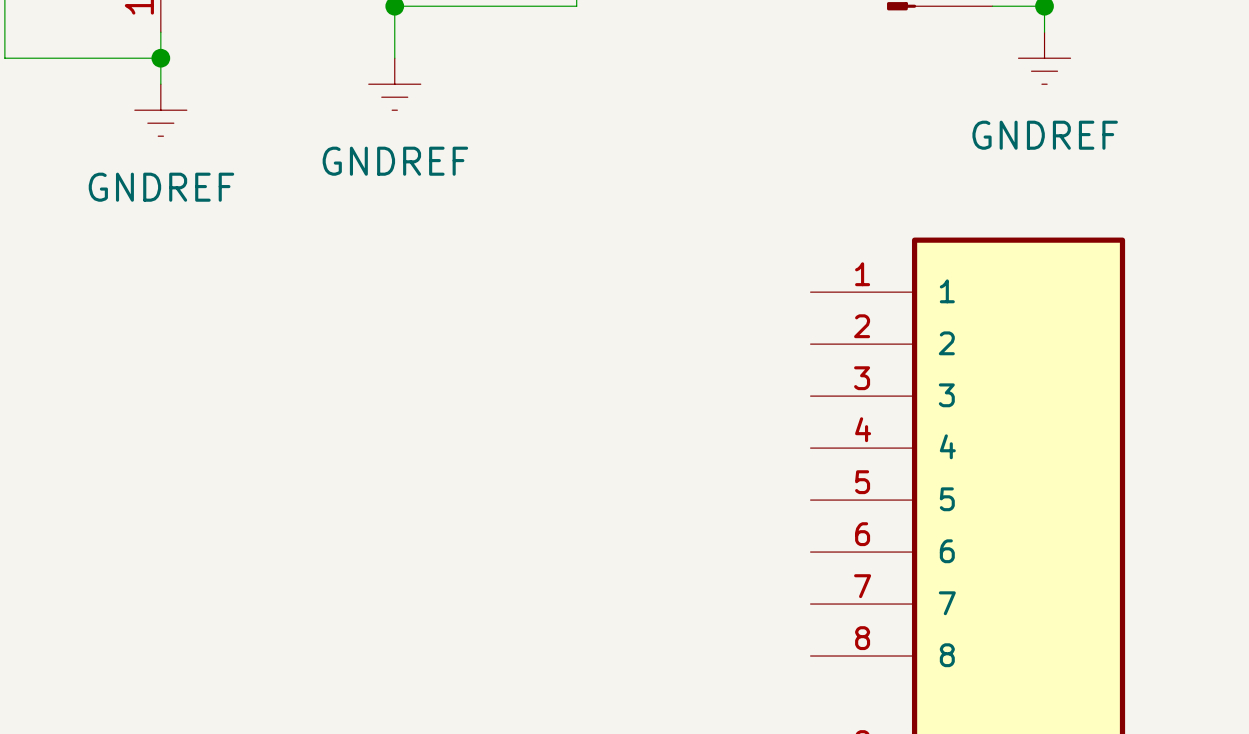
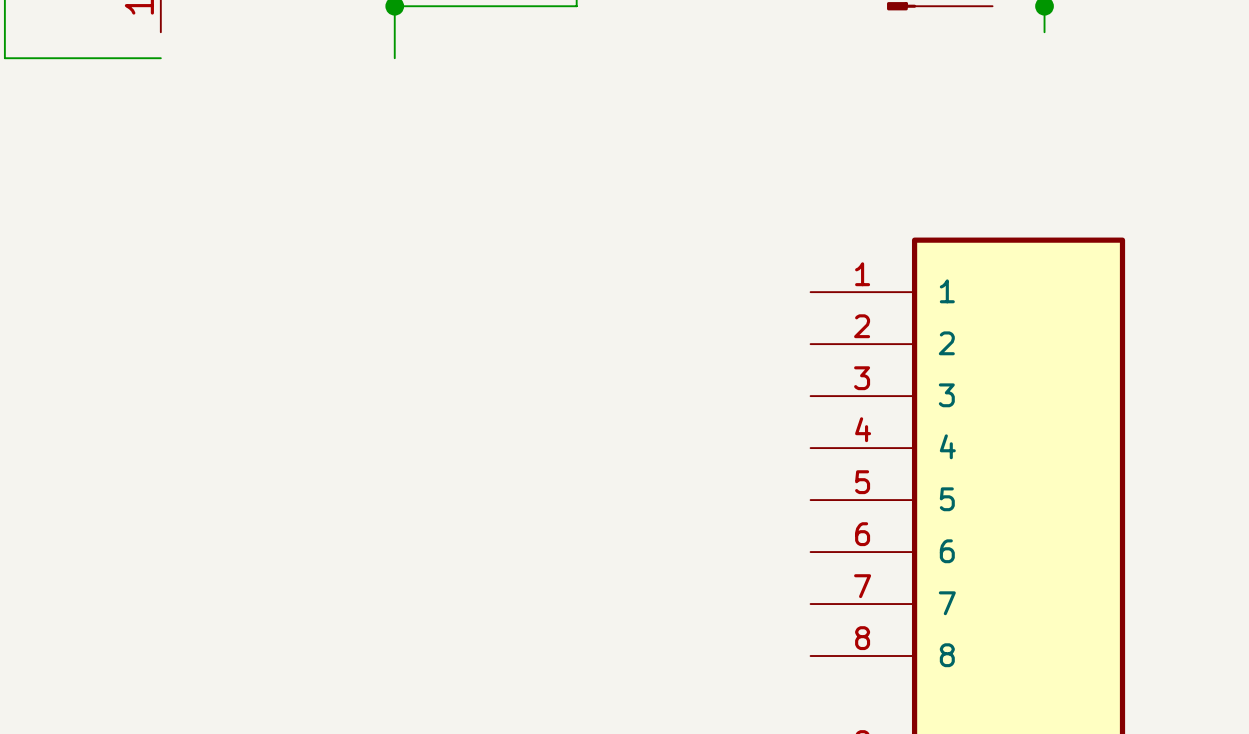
wire: (992, 6) (1044, 6) -> none
wire: (160, 32) (160, 84) -> none
junction: (160, 58) -> none
power symbol: GNDREF (1044, 58) -> none
power symbol: GNDREF (394, 84) -> none
power symbol: GNDREF (160, 110) -> none

